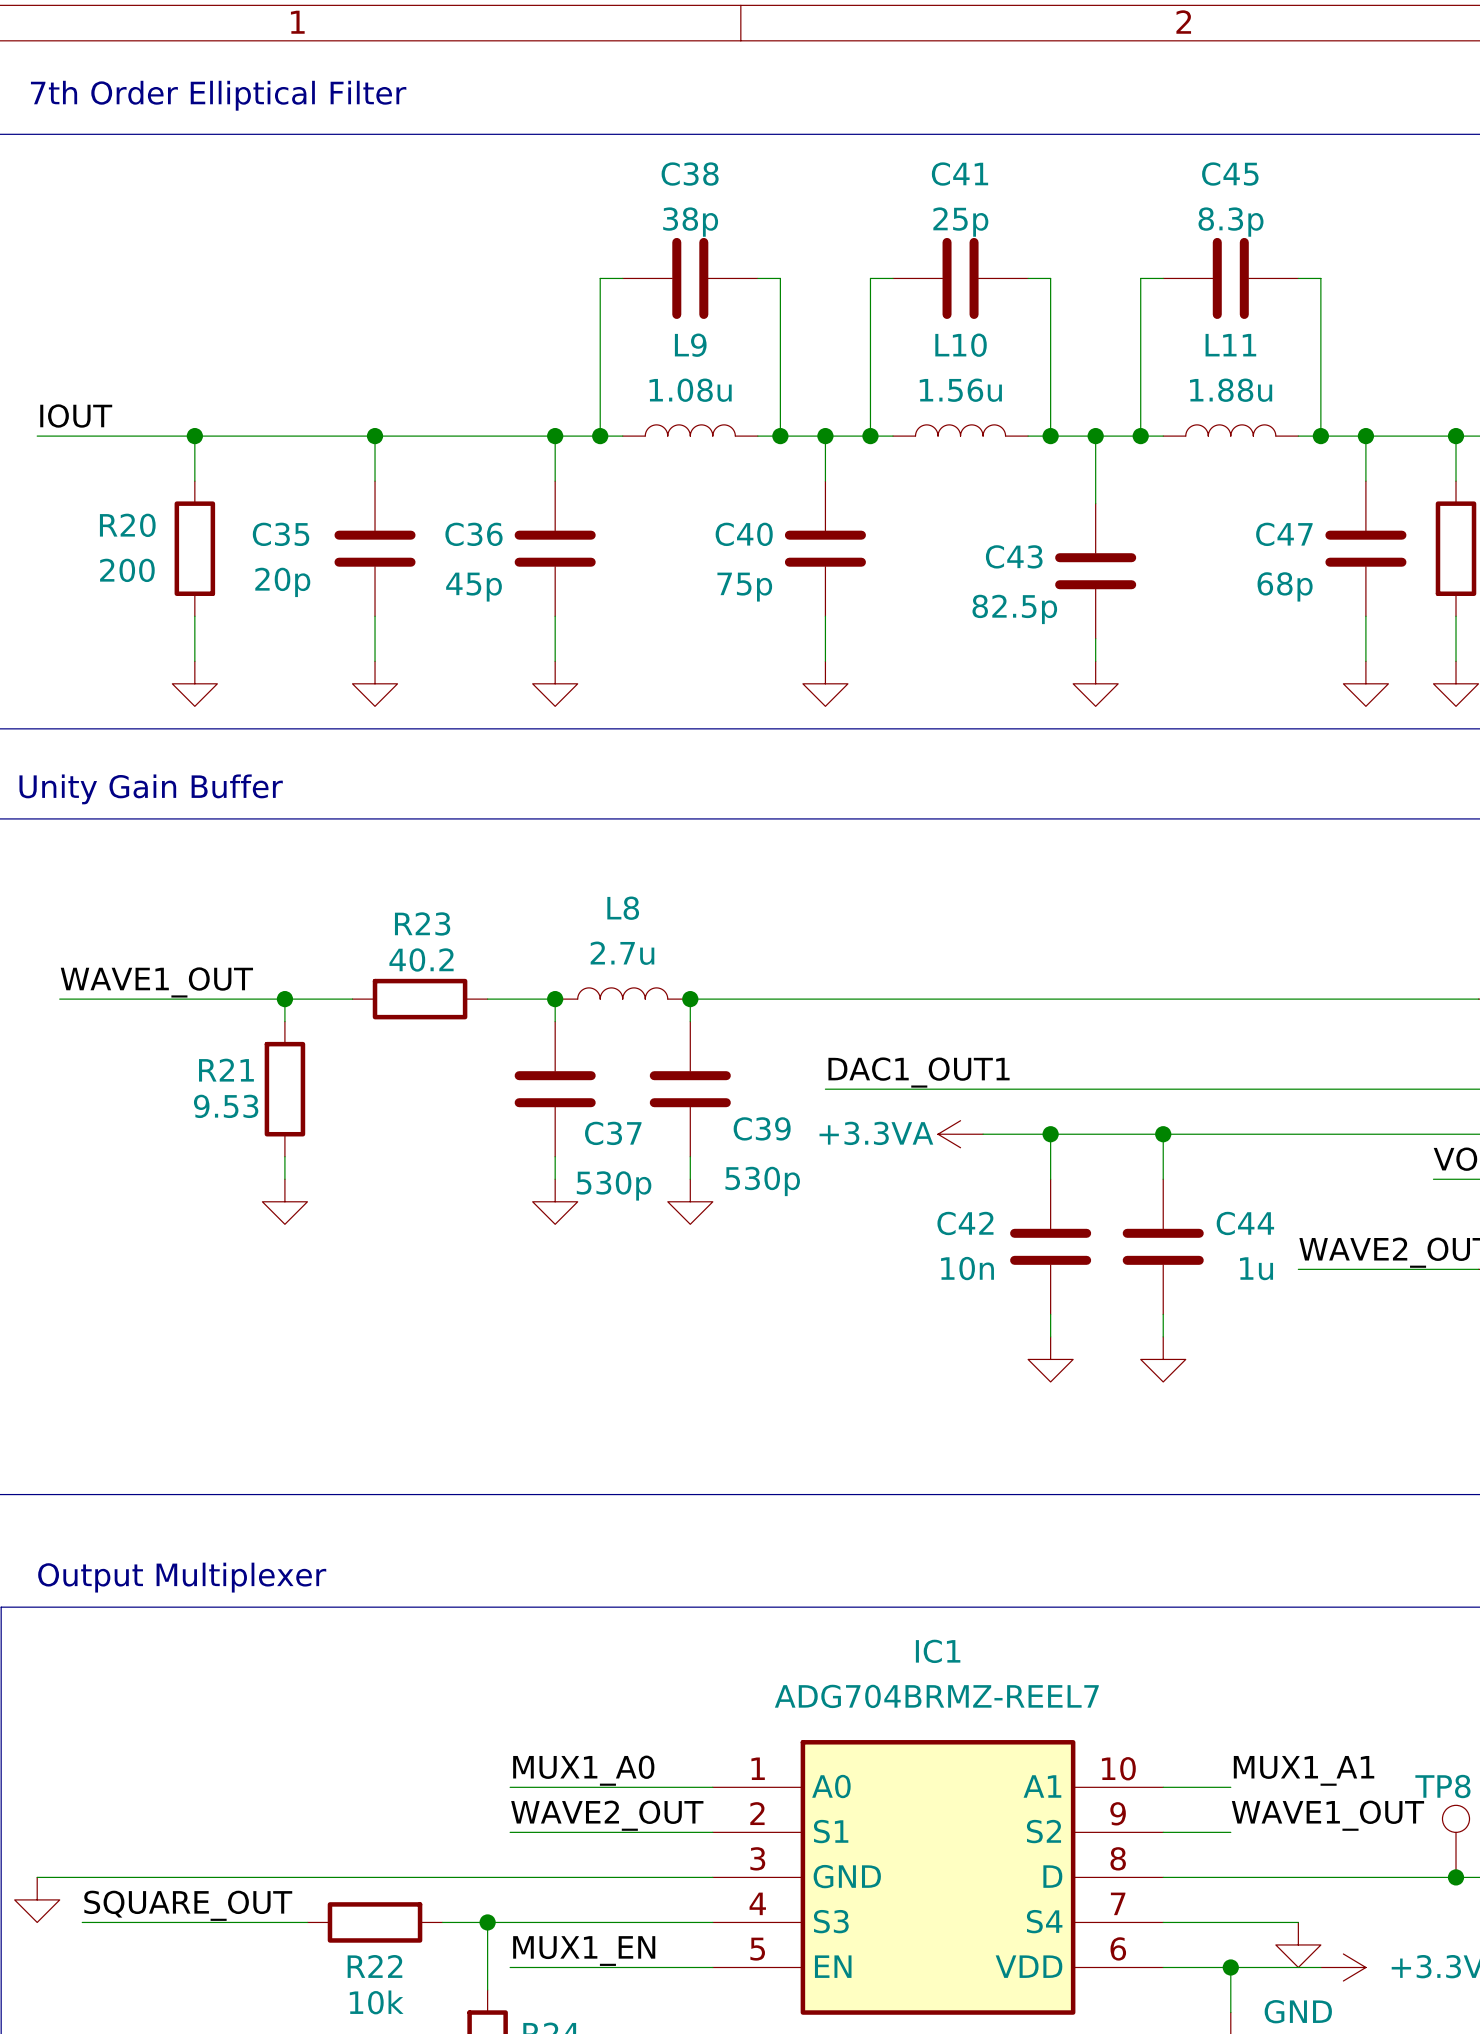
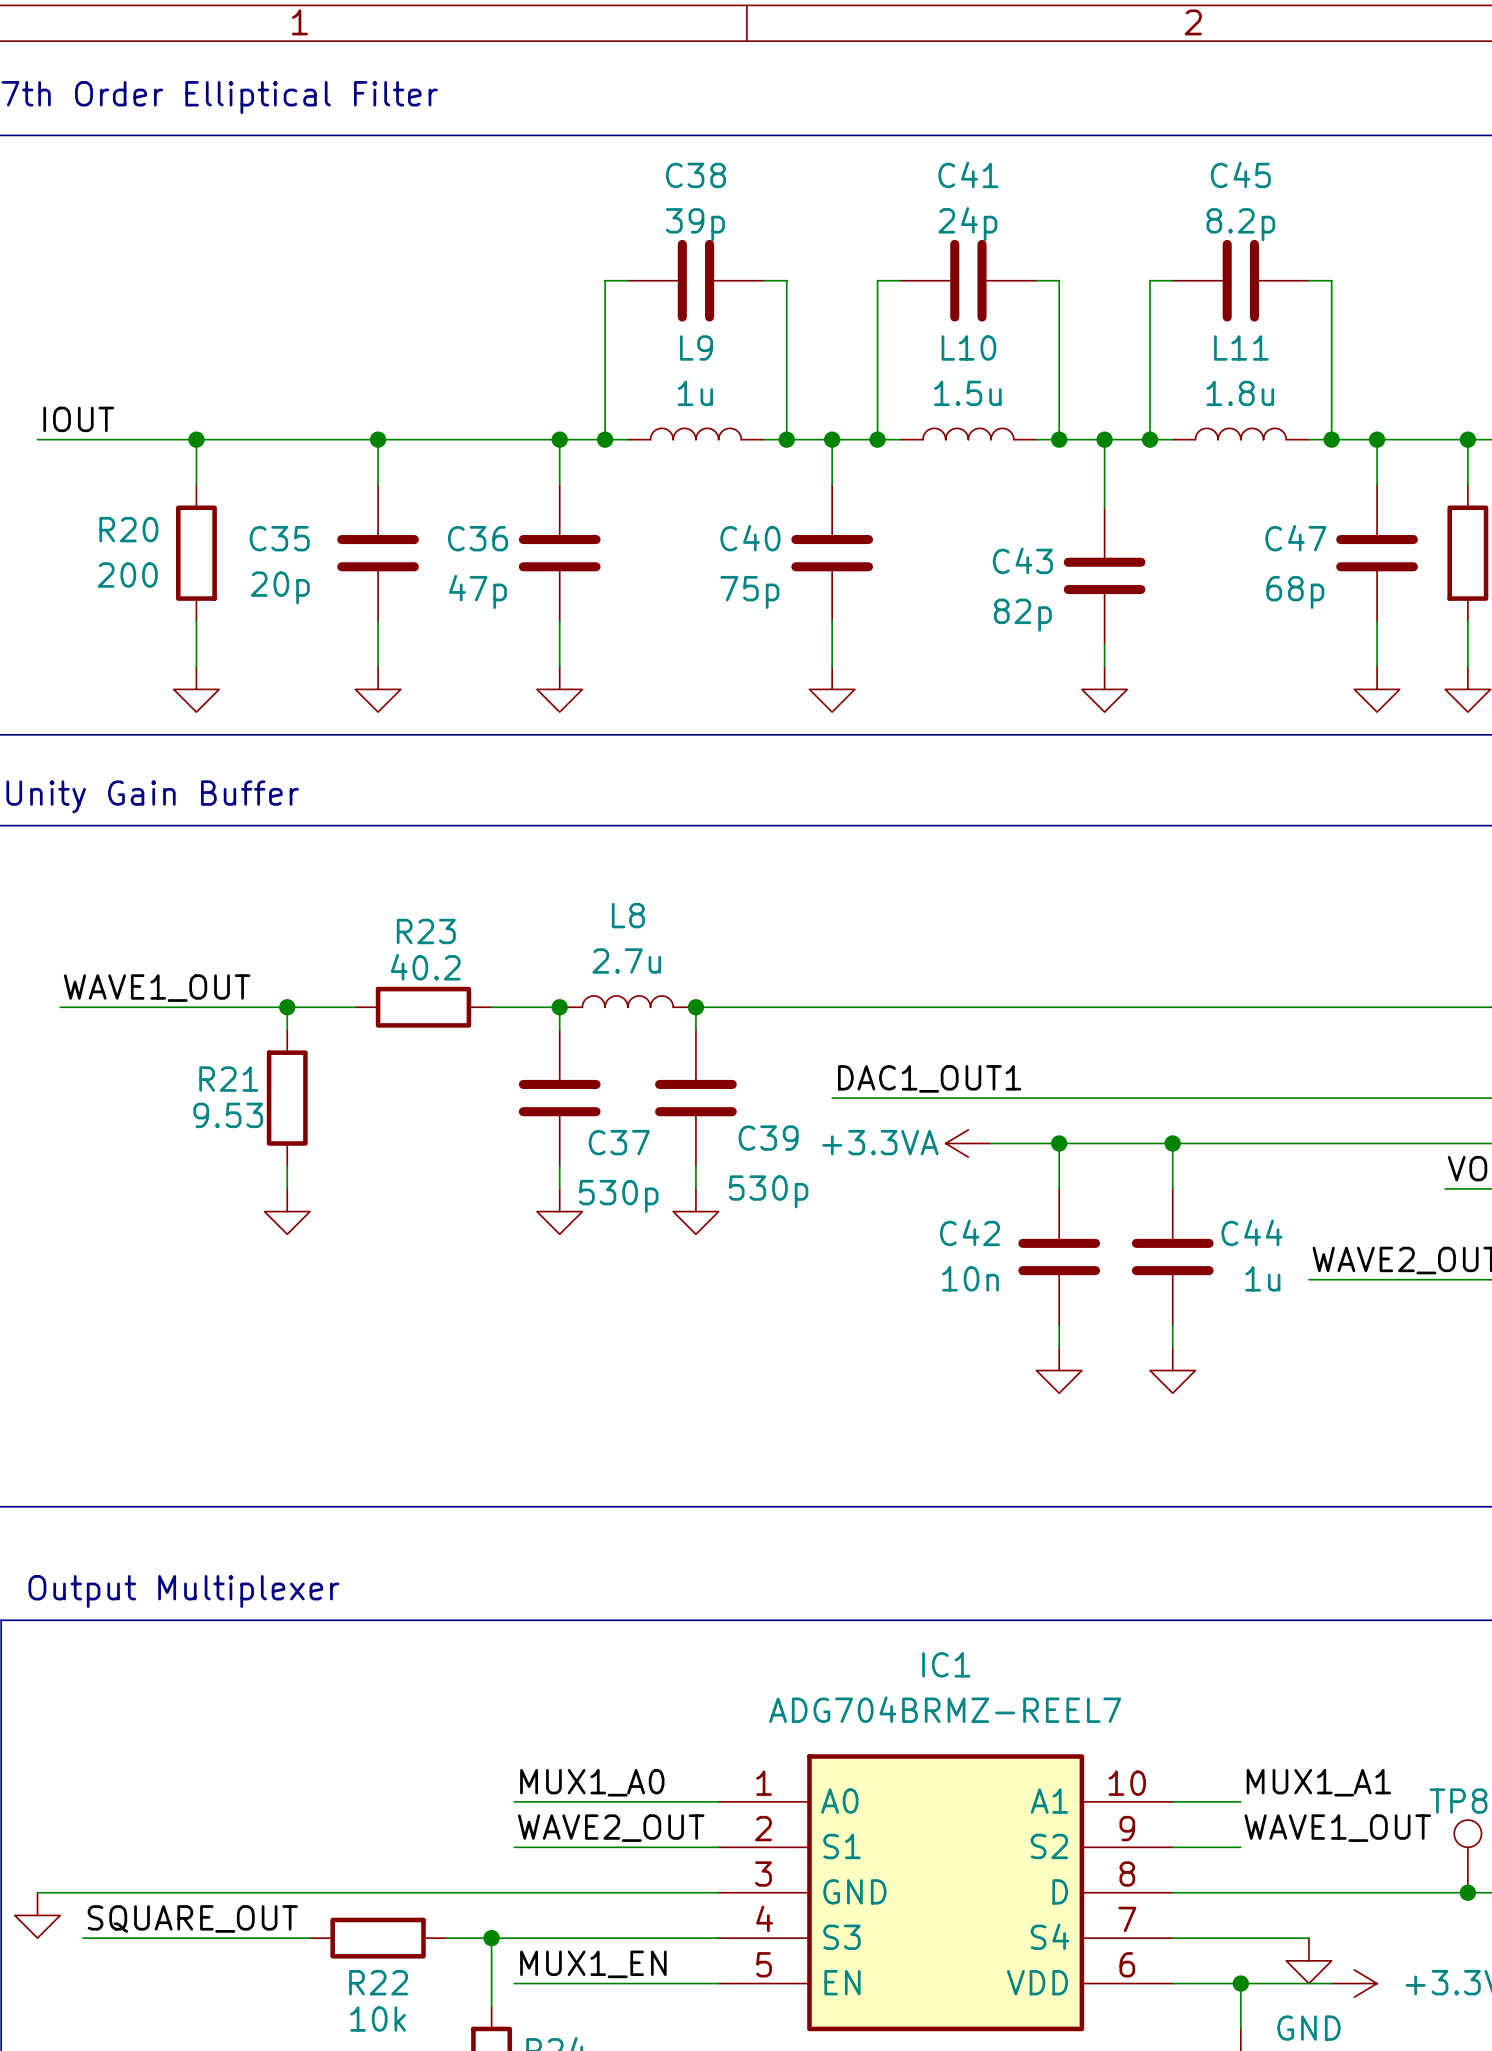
C38 value: 38p (690, 222) -> 39p (695, 224)
C41 value: 25p (960, 222) -> 24p (967, 224)
C45 value: 8.3p (1231, 222) -> 8.2p (1240, 224)
L9 value: 1.08u (690, 390) -> 1u (695, 393)
L10 value: 1.56u (960, 390) -> 1.5u (967, 393)
L11 value: 1.88u (1231, 390) -> 1.8u (1240, 393)
C36 value: 45p (474, 587) -> 47p (477, 591)
C43 value: 82.5p (1014, 609) -> 82p (1022, 615)

